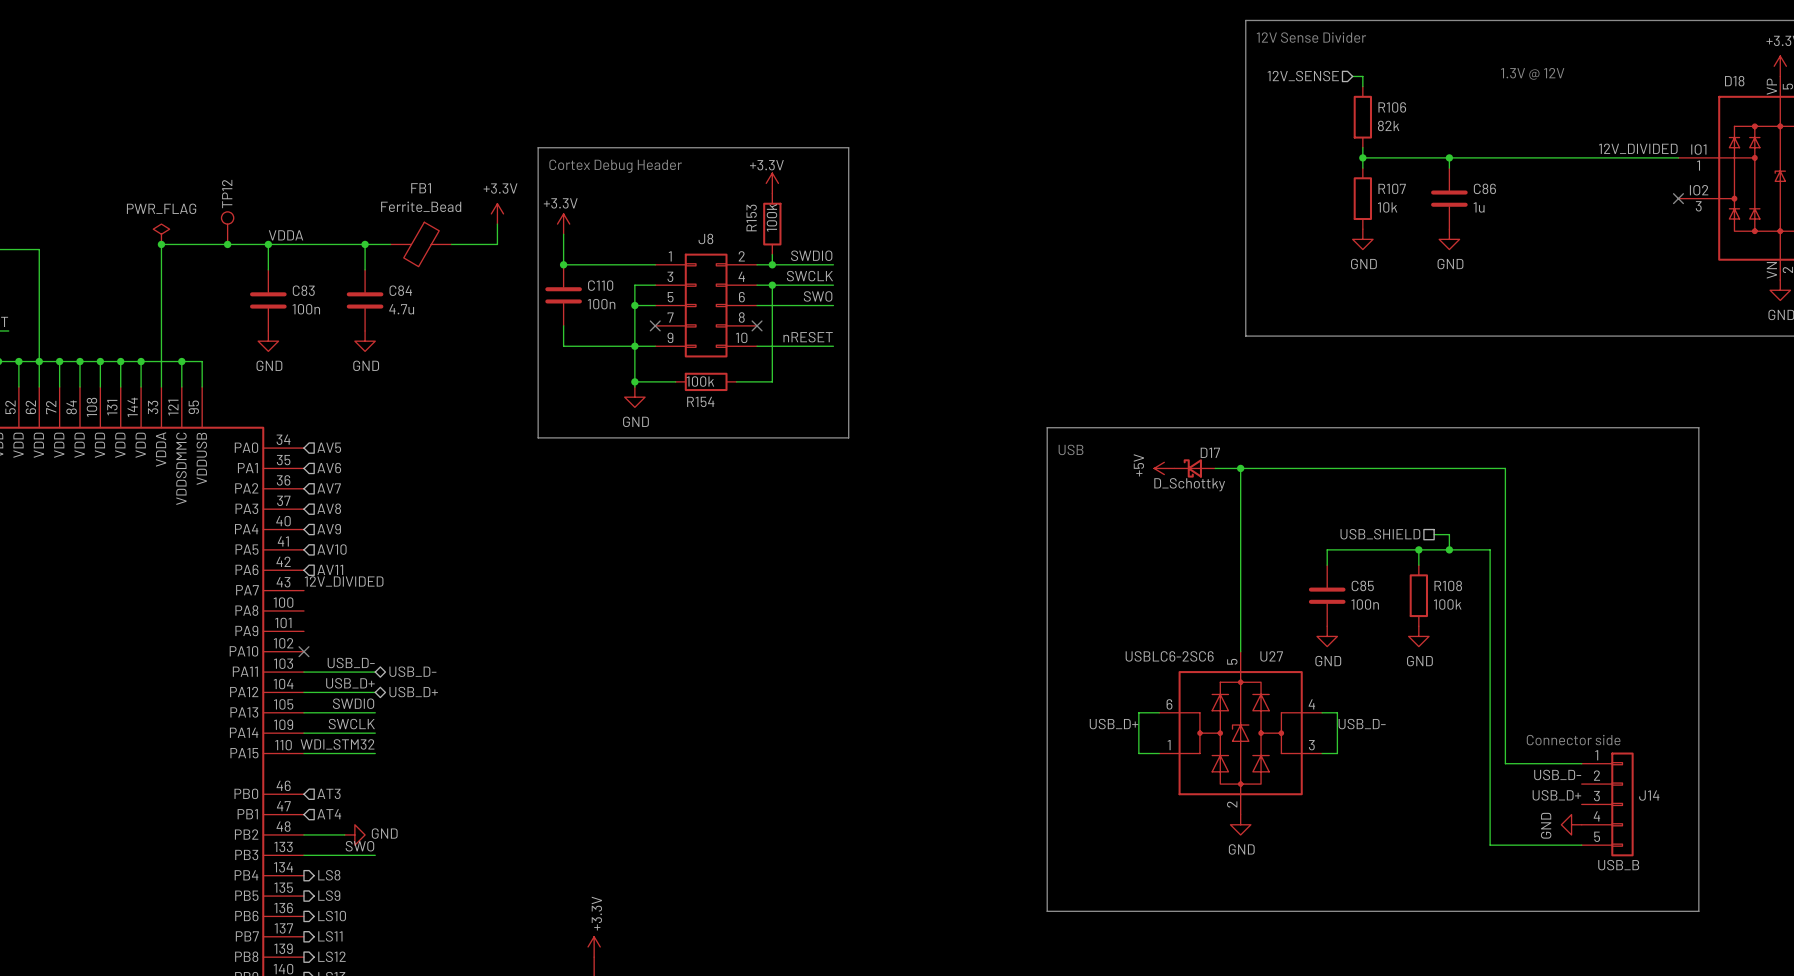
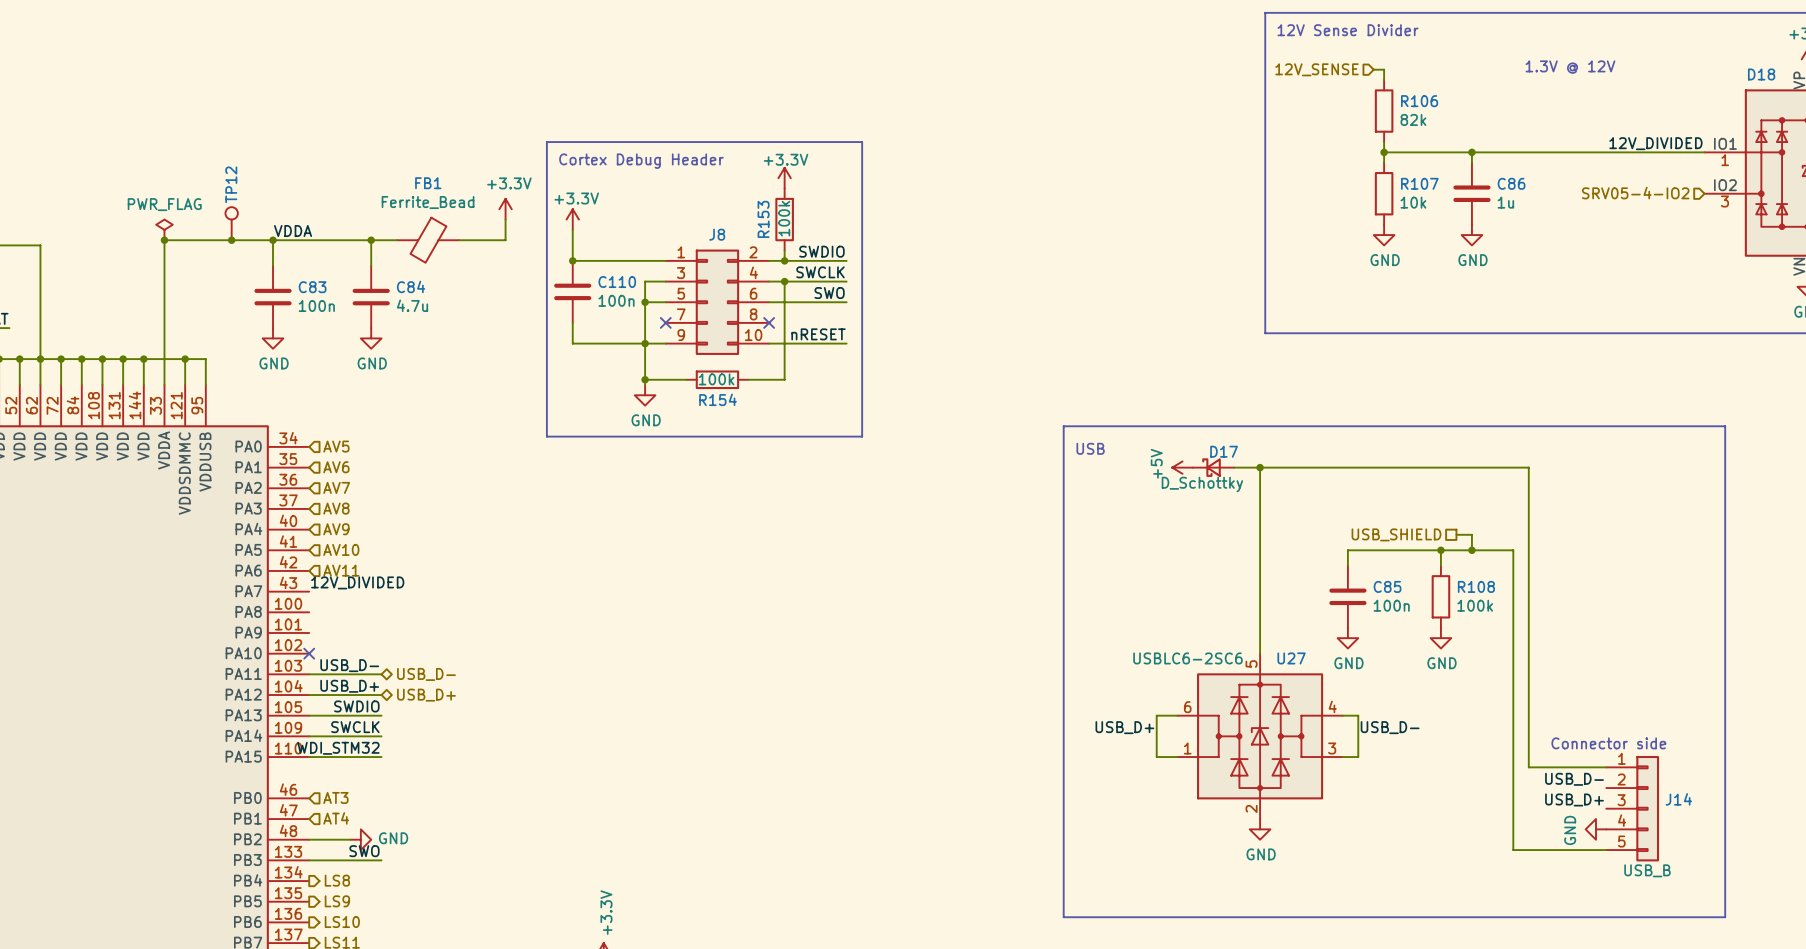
hierarchical label: none -> SRV05-4-IO2 (1635, 193)
no-connect mark: (1678, 198) -> none

